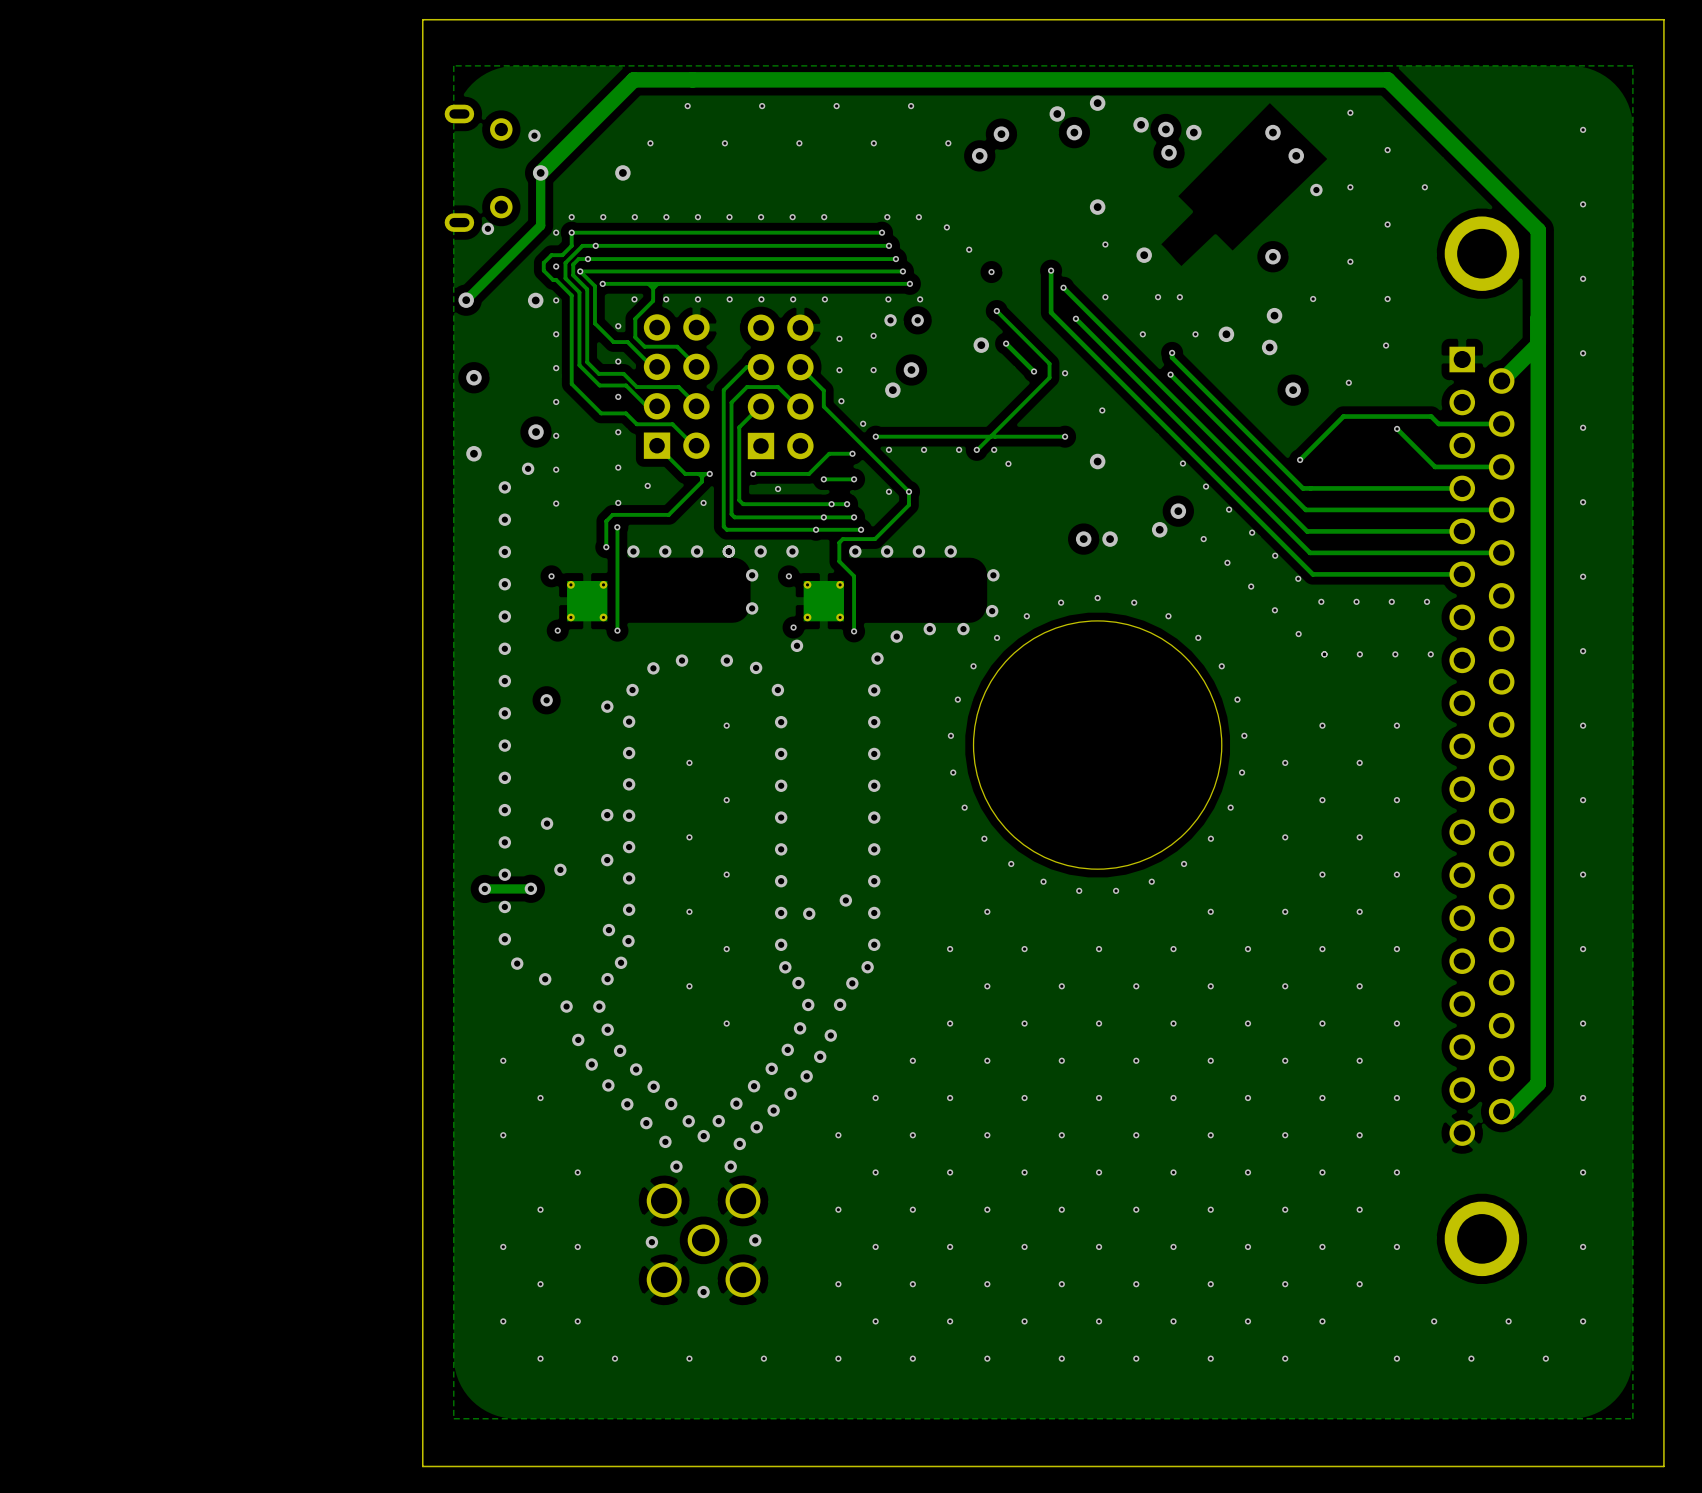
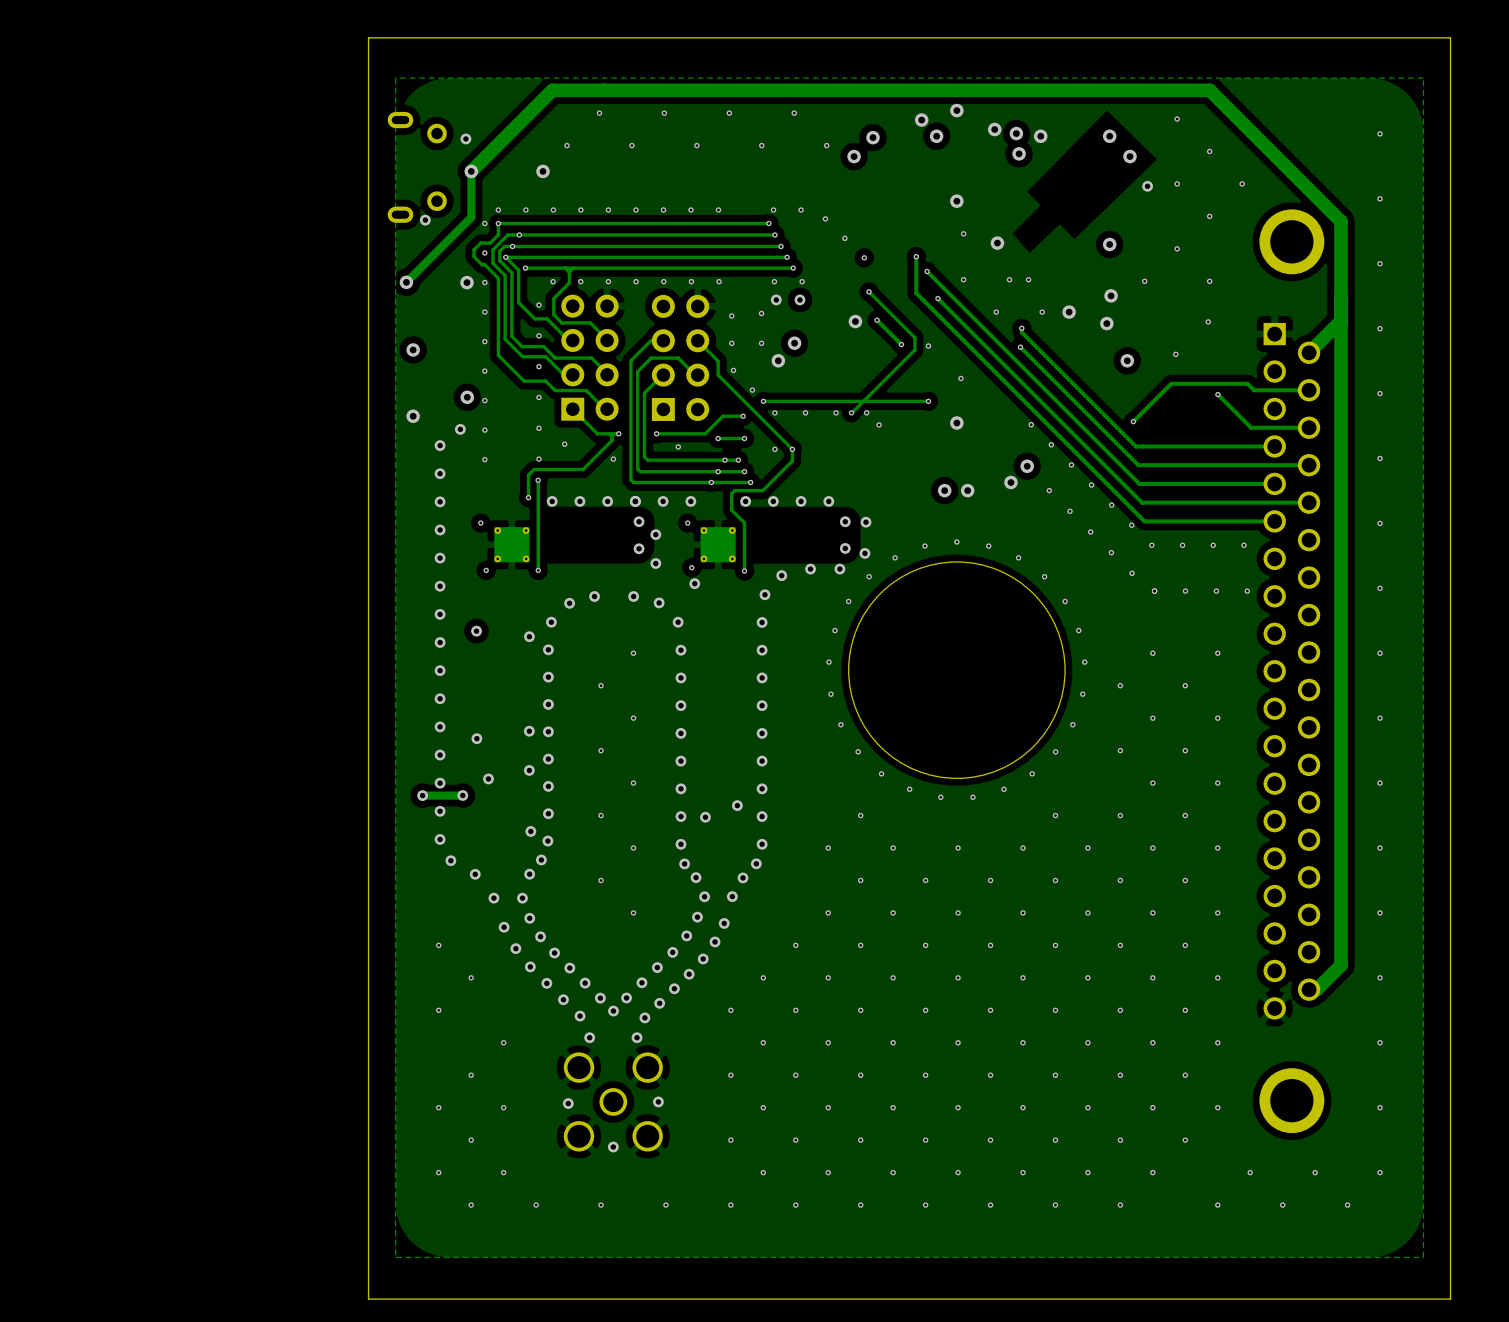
via: none -> (639, 521)
via: none -> (845, 521)
via: (752, 575) -> none
via: none -> (655, 534)
via: none -> (639, 548)
via: none -> (845, 548)
via: (752, 608) -> none
via: none -> (655, 563)

